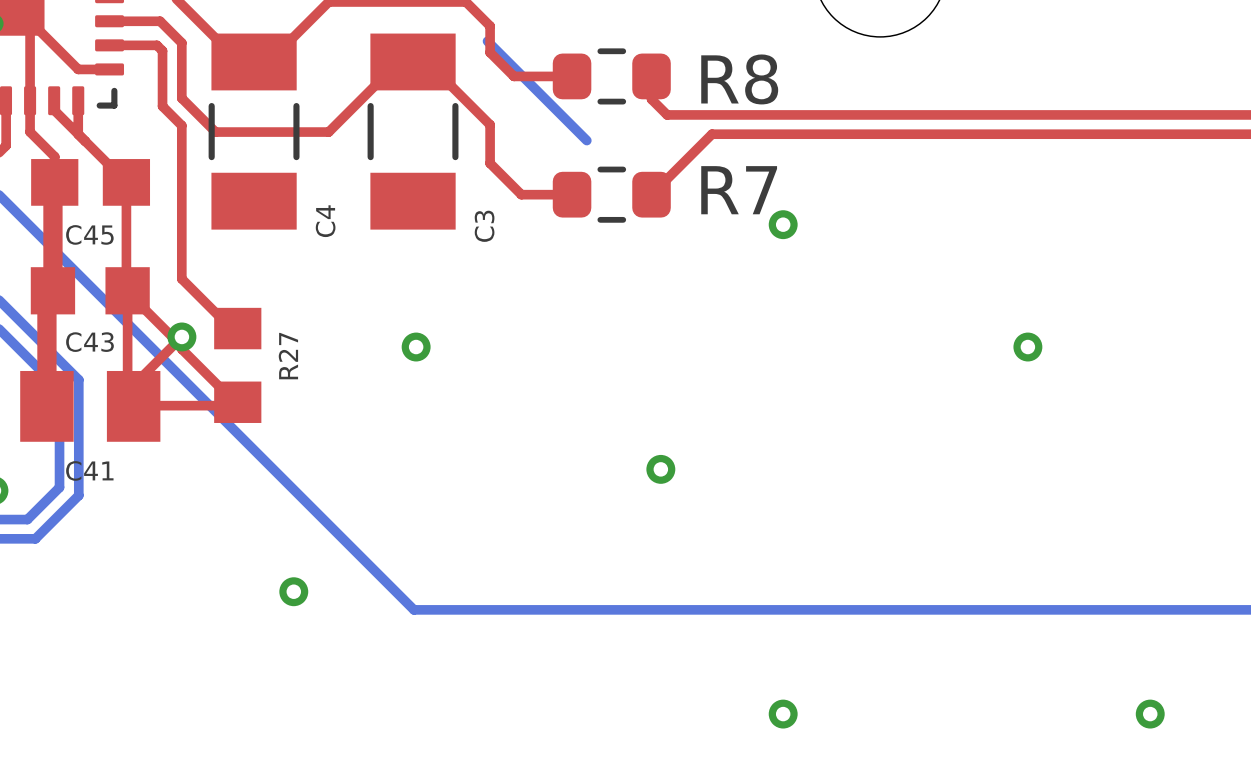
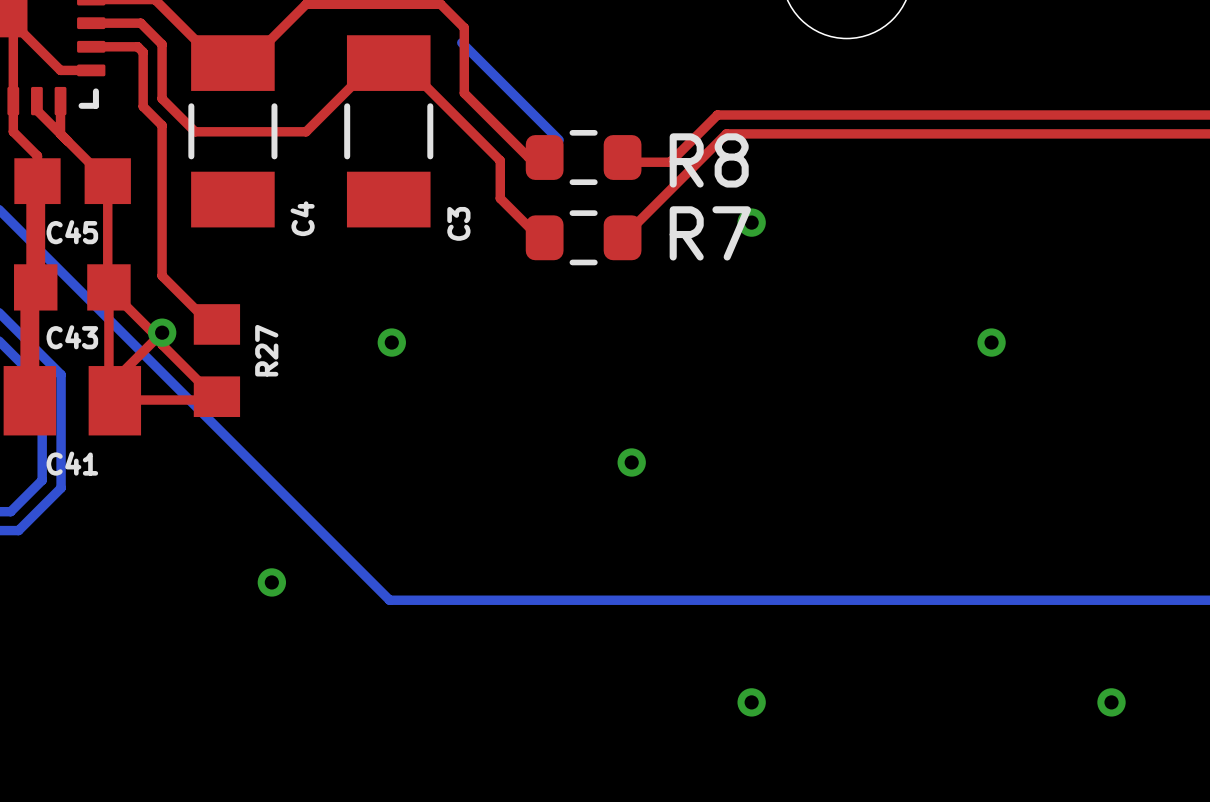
top track: (490, 52) (513, 76) (569, 76) -> (464, 53) (464, 93) (528, 157) (544, 157)
R8 position: (611, 76) -> (583, 157)
top track: (651, 76) (651, 99) (667, 114) (748, 114) -> (622, 157) (627, 162) (670, 162) (717, 115)
top track: (490, 124) (490, 163) (521, 194) (569, 194) -> (464, 124) (500, 160) (500, 198) (539, 237) (544, 237)
top track: (757, 134) (712, 134) (651, 194) (658, 201) -> (726, 133) (622, 237)
R7 position: (611, 194) -> (583, 237)

